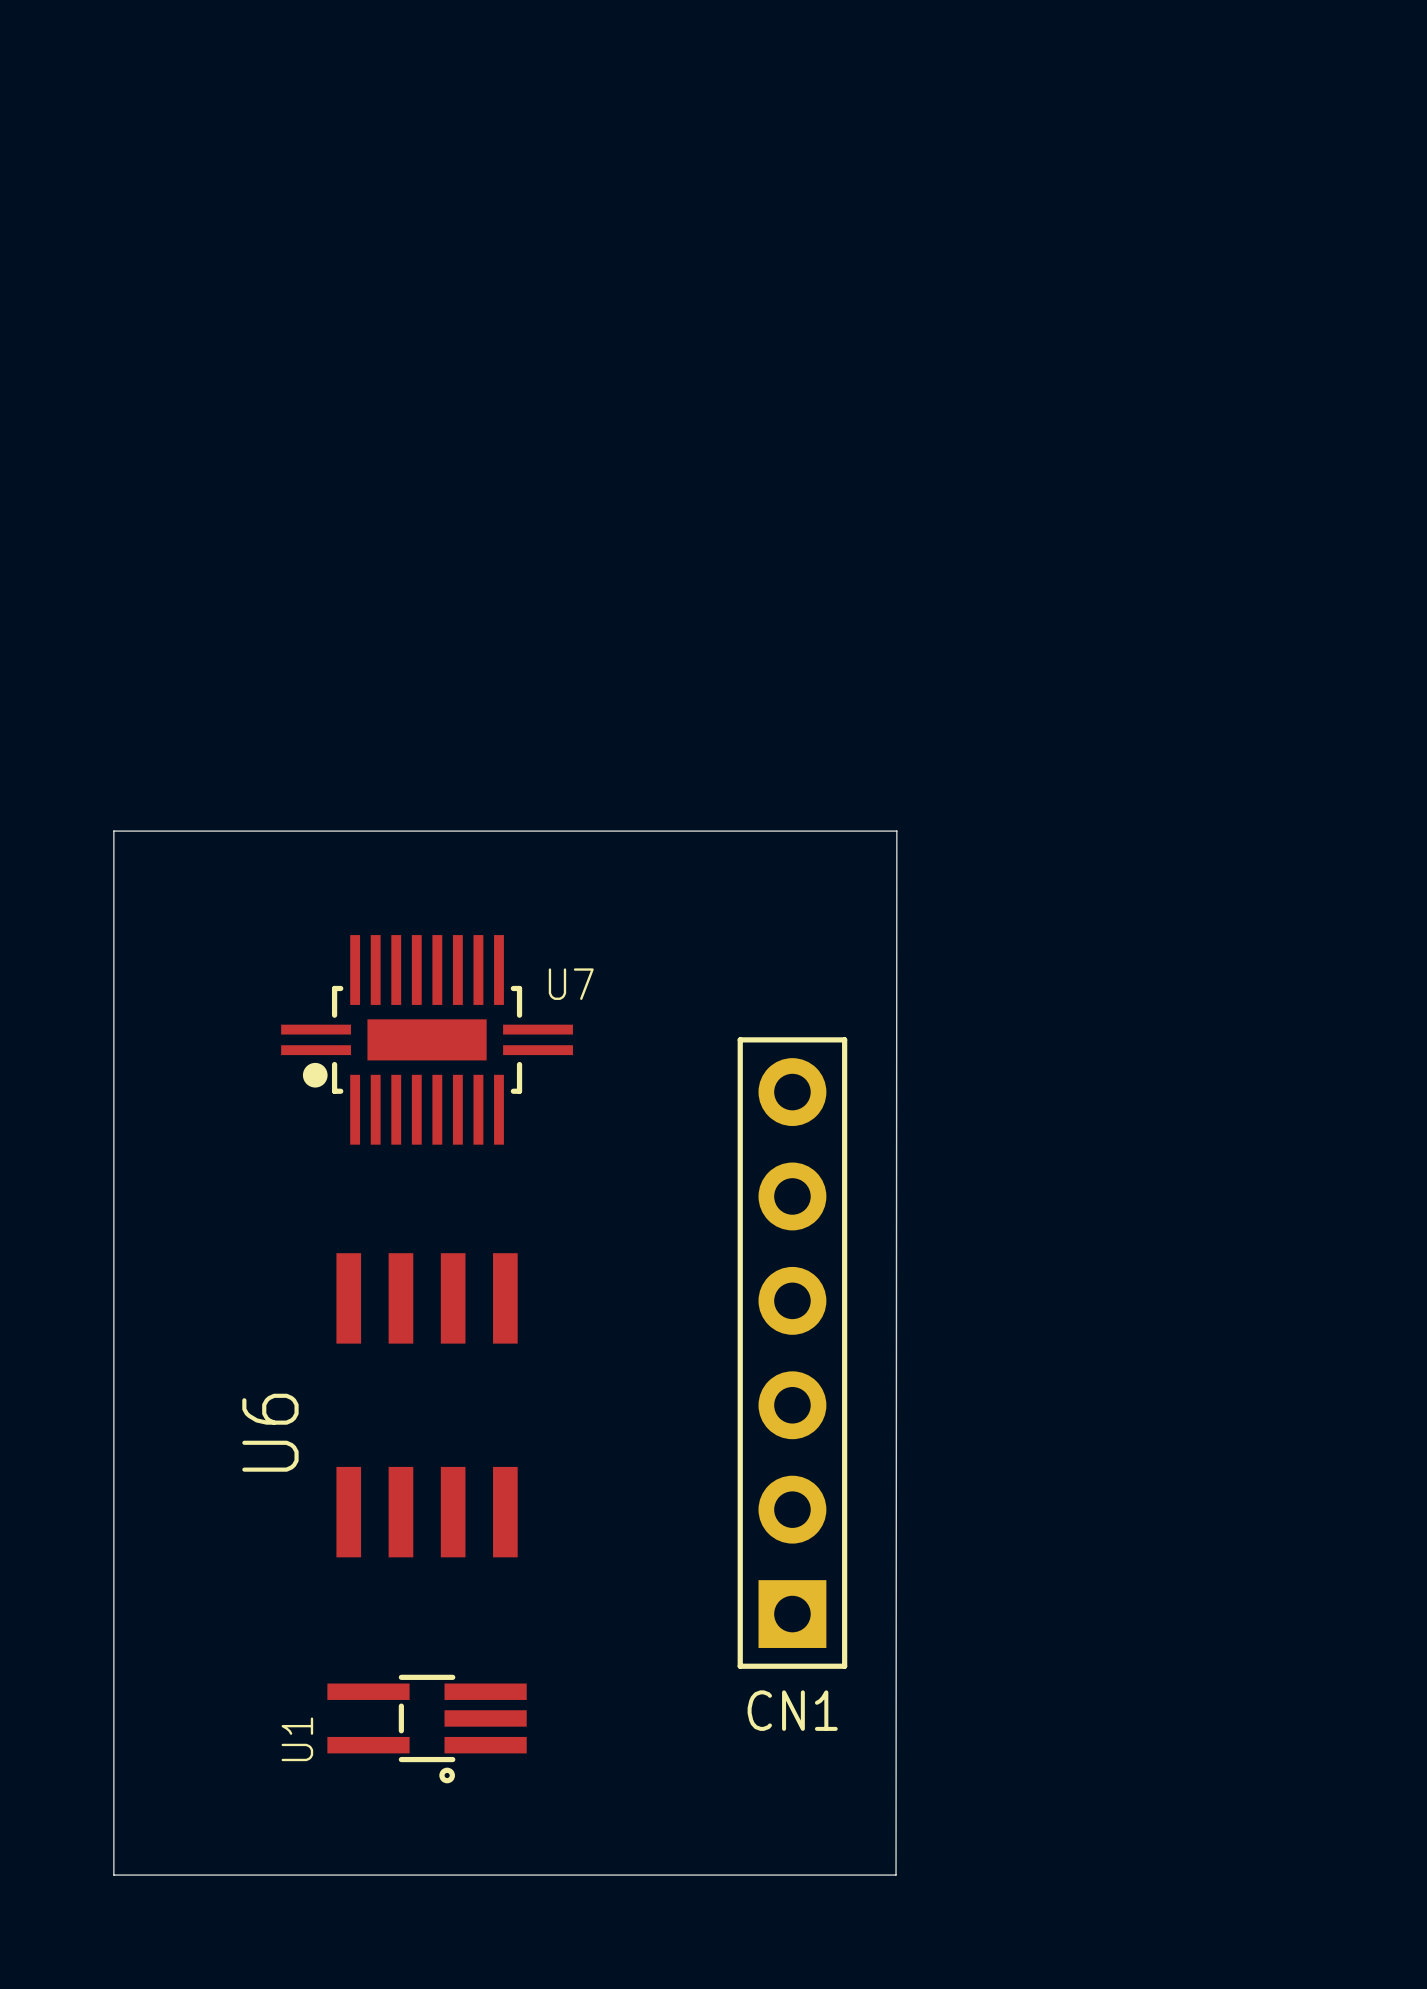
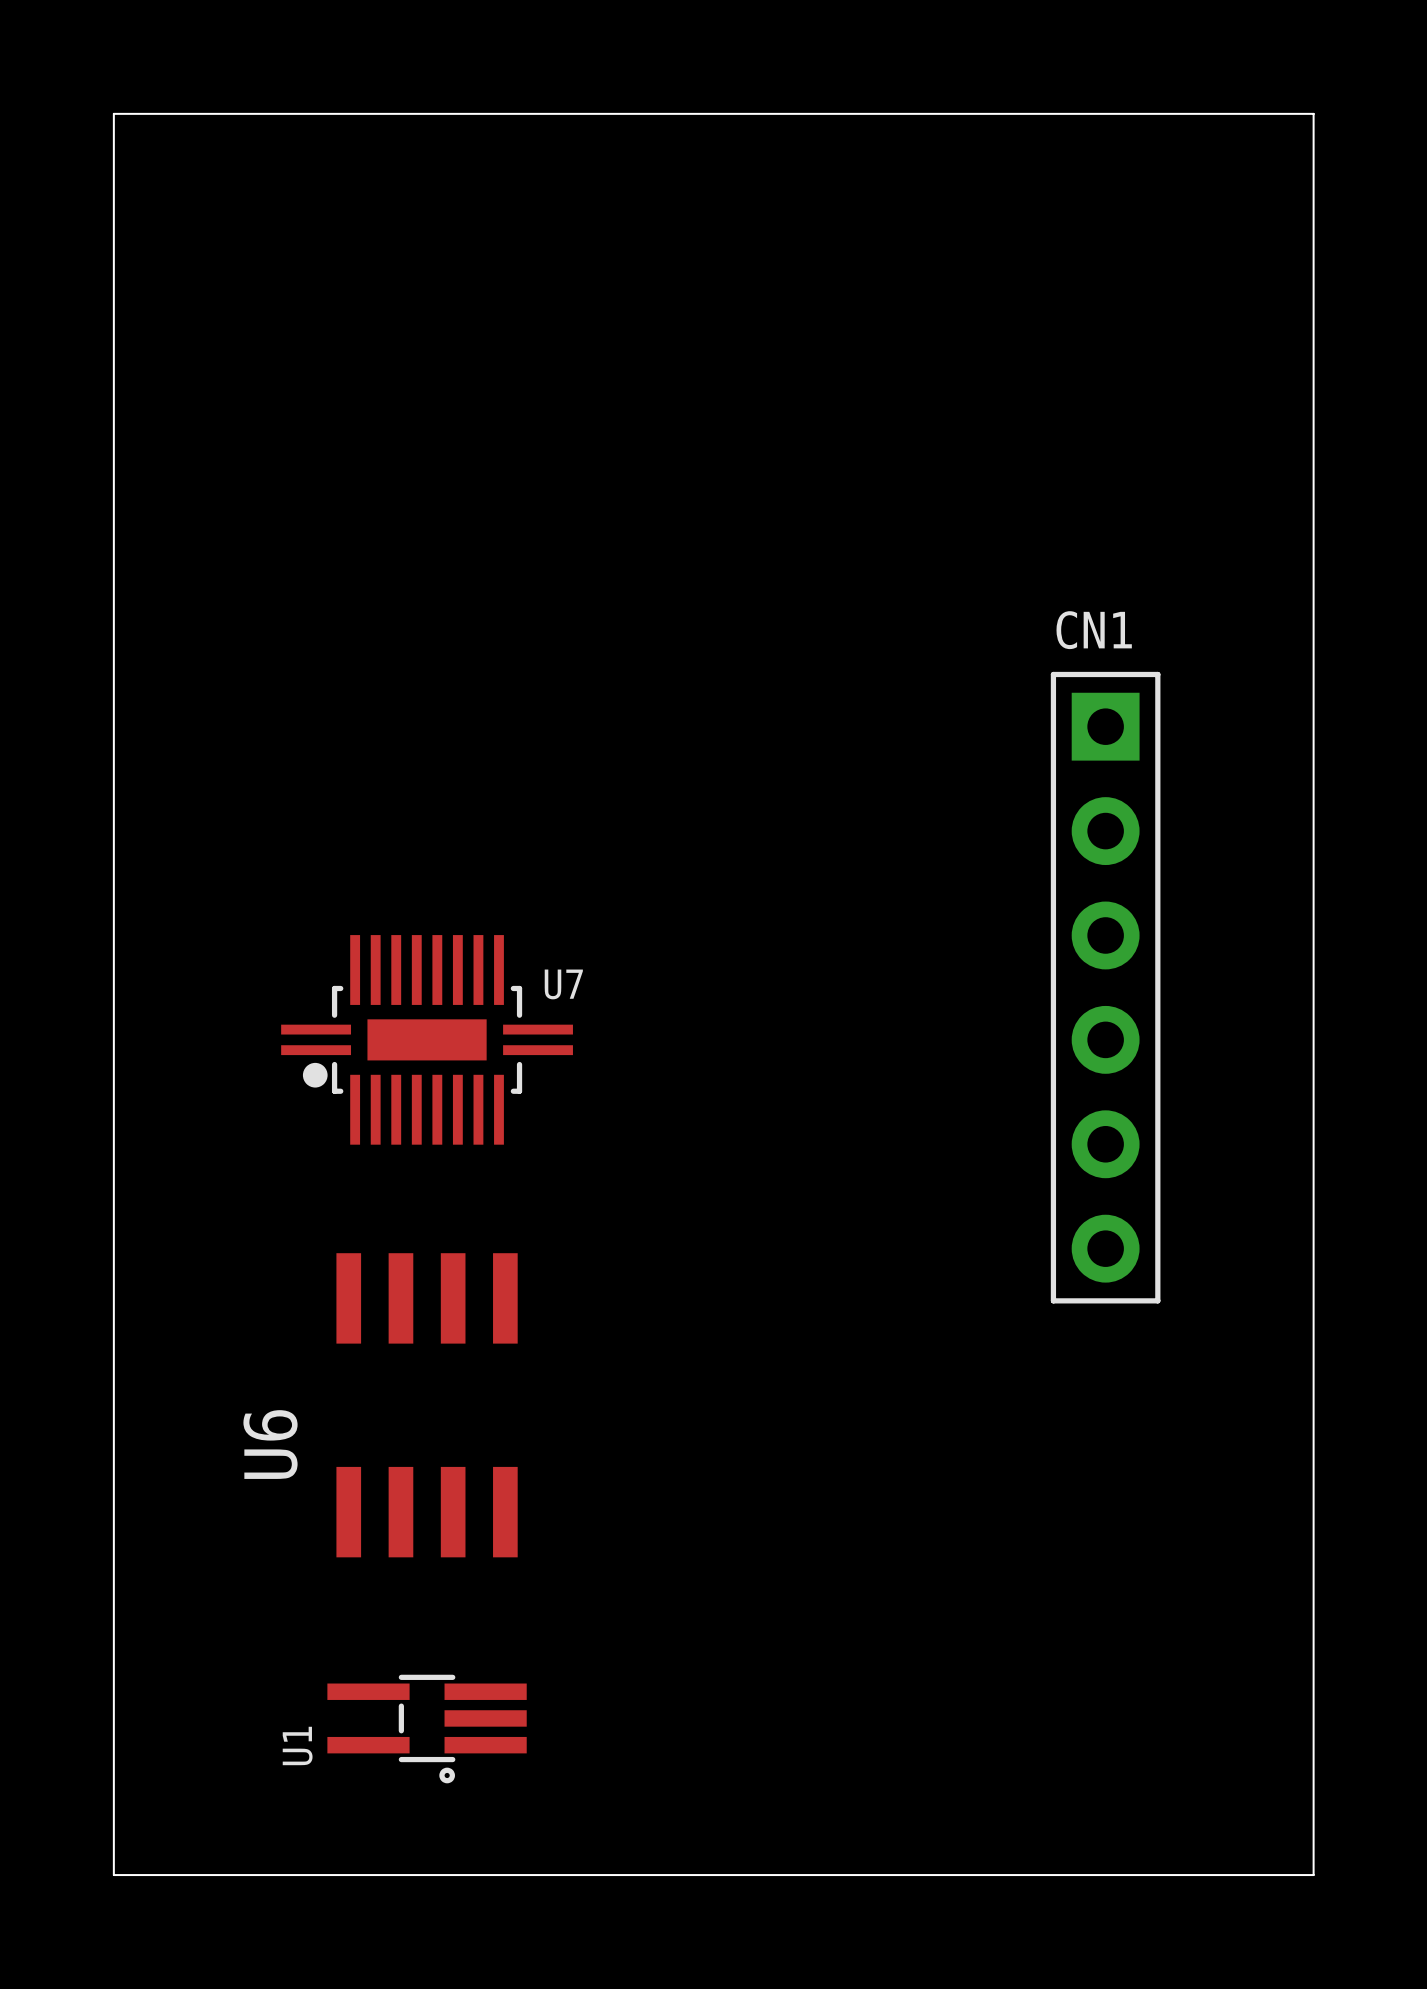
board edge: (113, 831) (896, 831) (896, 1875) -> (113, 831) (113, 113) (1313, 113) (1313, 1875) (896, 1875)
CN1 rotation: 0° (792, 1353) -> 180° (1105, 987)
CN1 position: (792, 1353) -> (1105, 987)

